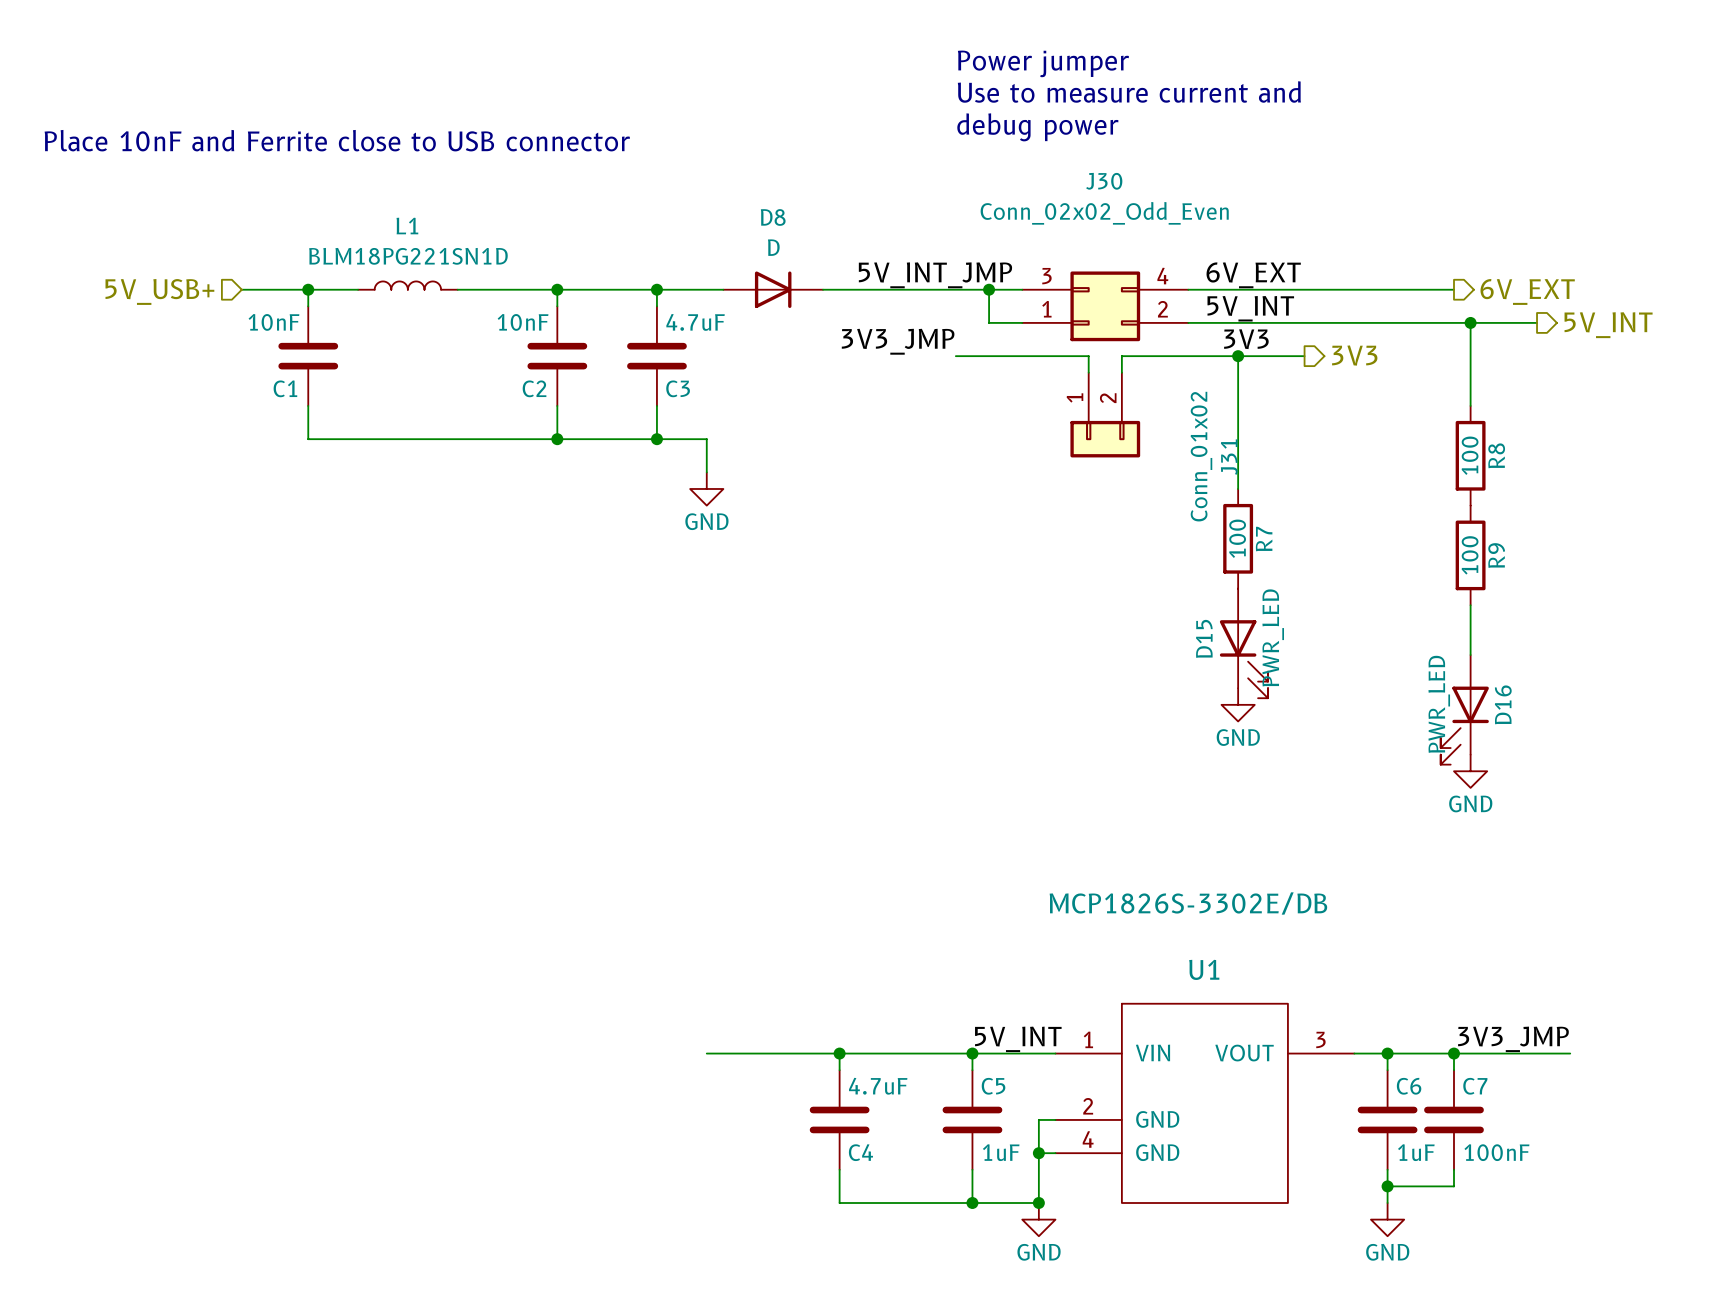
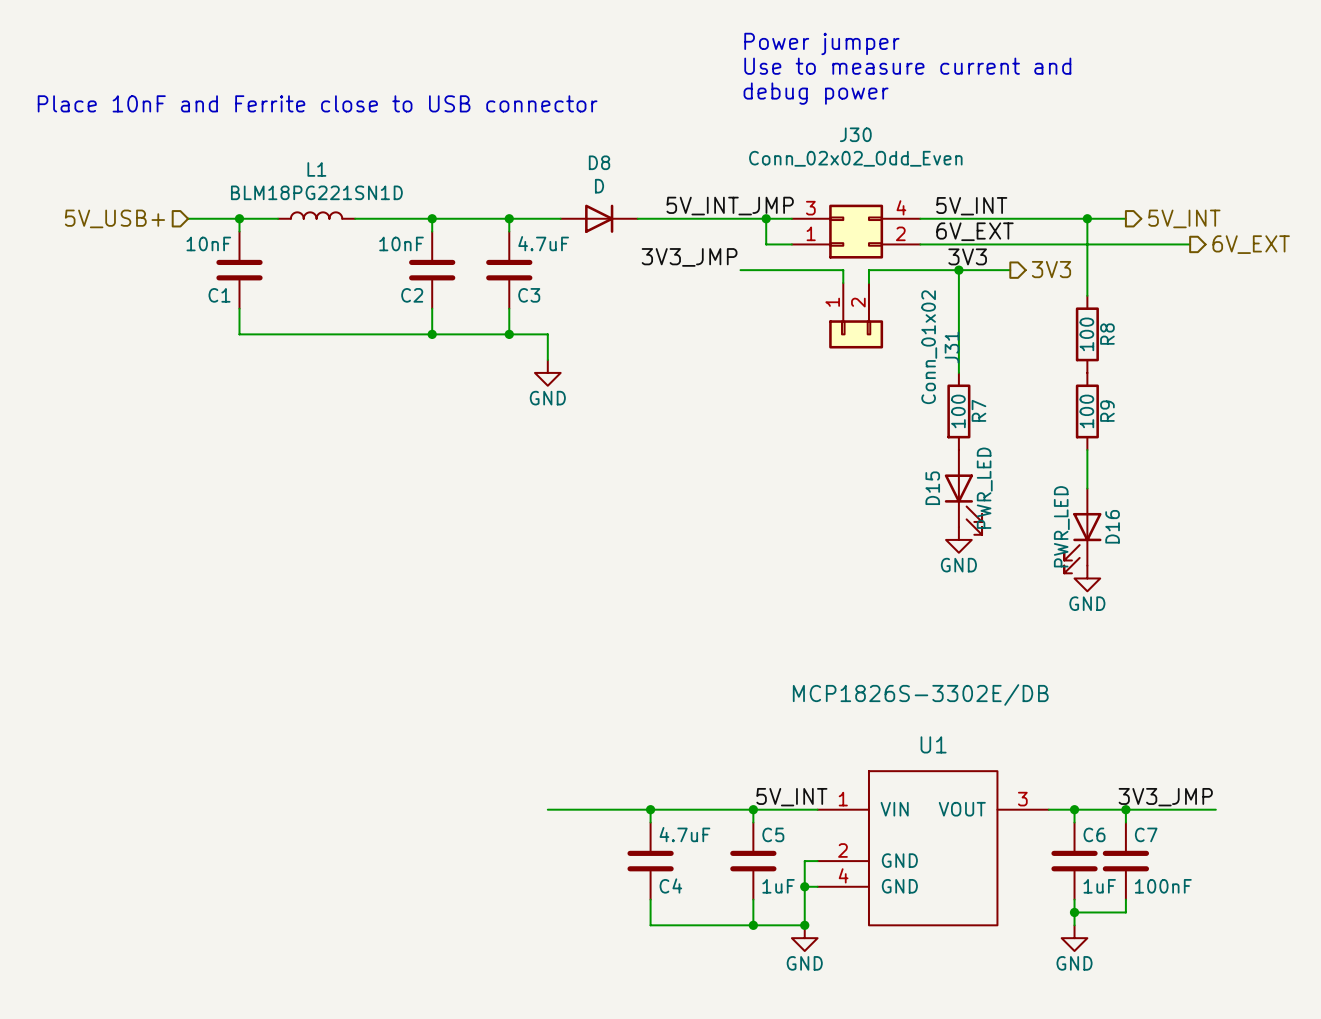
label: 6V_EXT (1253, 275) -> 5V_INT (971, 206)
wire: none -> (1087, 218) (1087, 295)
hierarchical label: 6V_EXT (1527, 291) -> 5V_INT (1184, 218)
label: 5V_INT (1250, 308) -> 6V_EXT (974, 231)
wire: (1470, 322) (1470, 405) -> none
junction position: (1470, 322) -> (1087, 218)
hierarchical label: 5V_INT (1608, 325) -> 6V_EXT (1251, 244)
R8 position: (1470, 455) -> (1087, 334)
R9 position: (1470, 555) -> (1087, 411)
wire: (1470, 605) (1470, 655) -> (1087, 450) (1087, 488)
D16 position: (1464, 709) -> (1082, 530)
power symbol position: GND (1470, 771) -> GND (1087, 578)

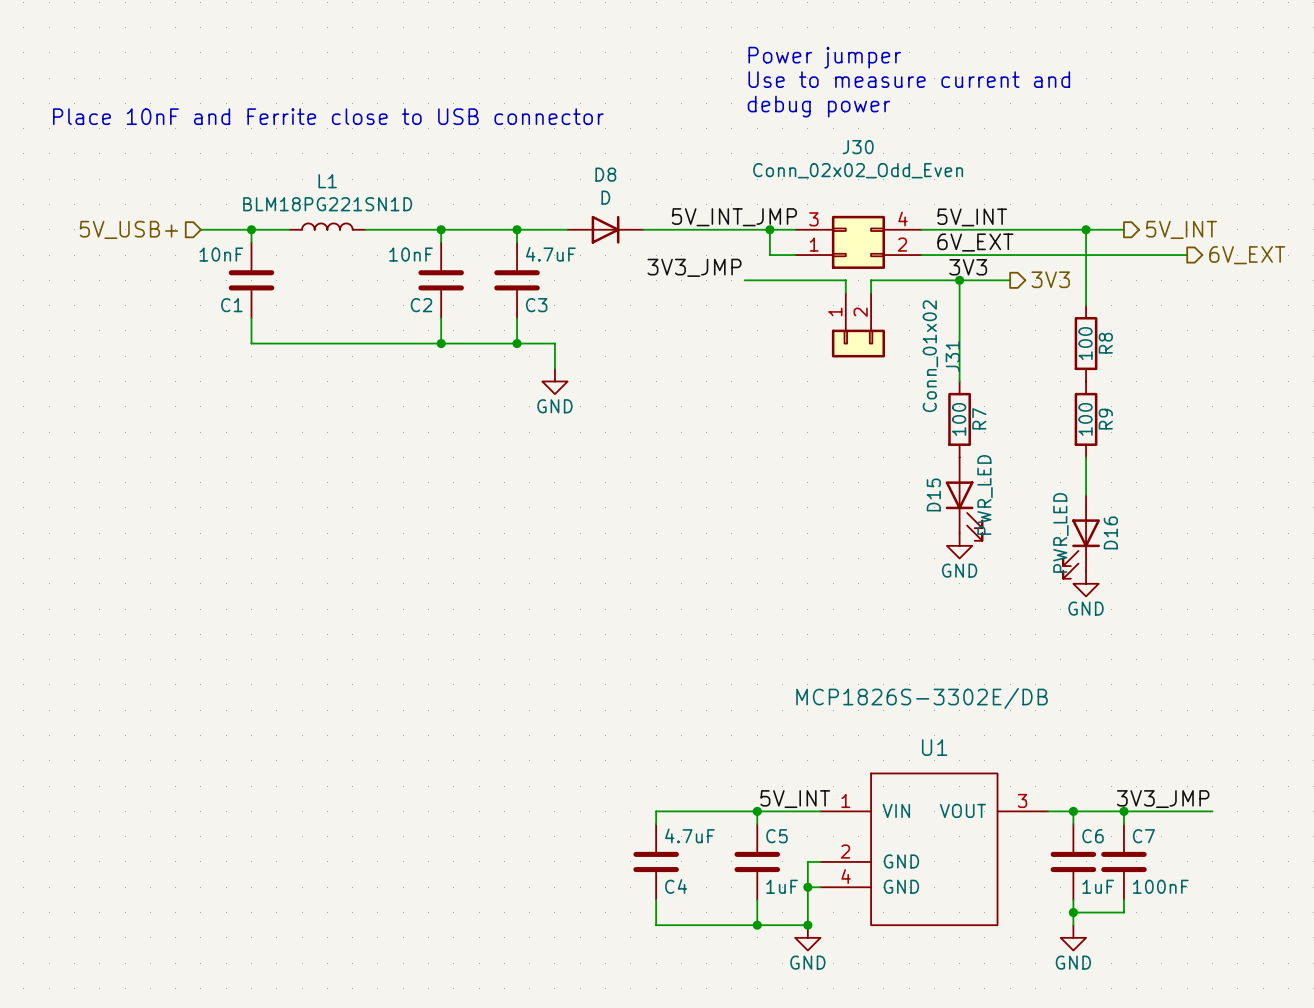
wire: (547, 809) (650, 809) -> none
junction: (650, 809) -> none

